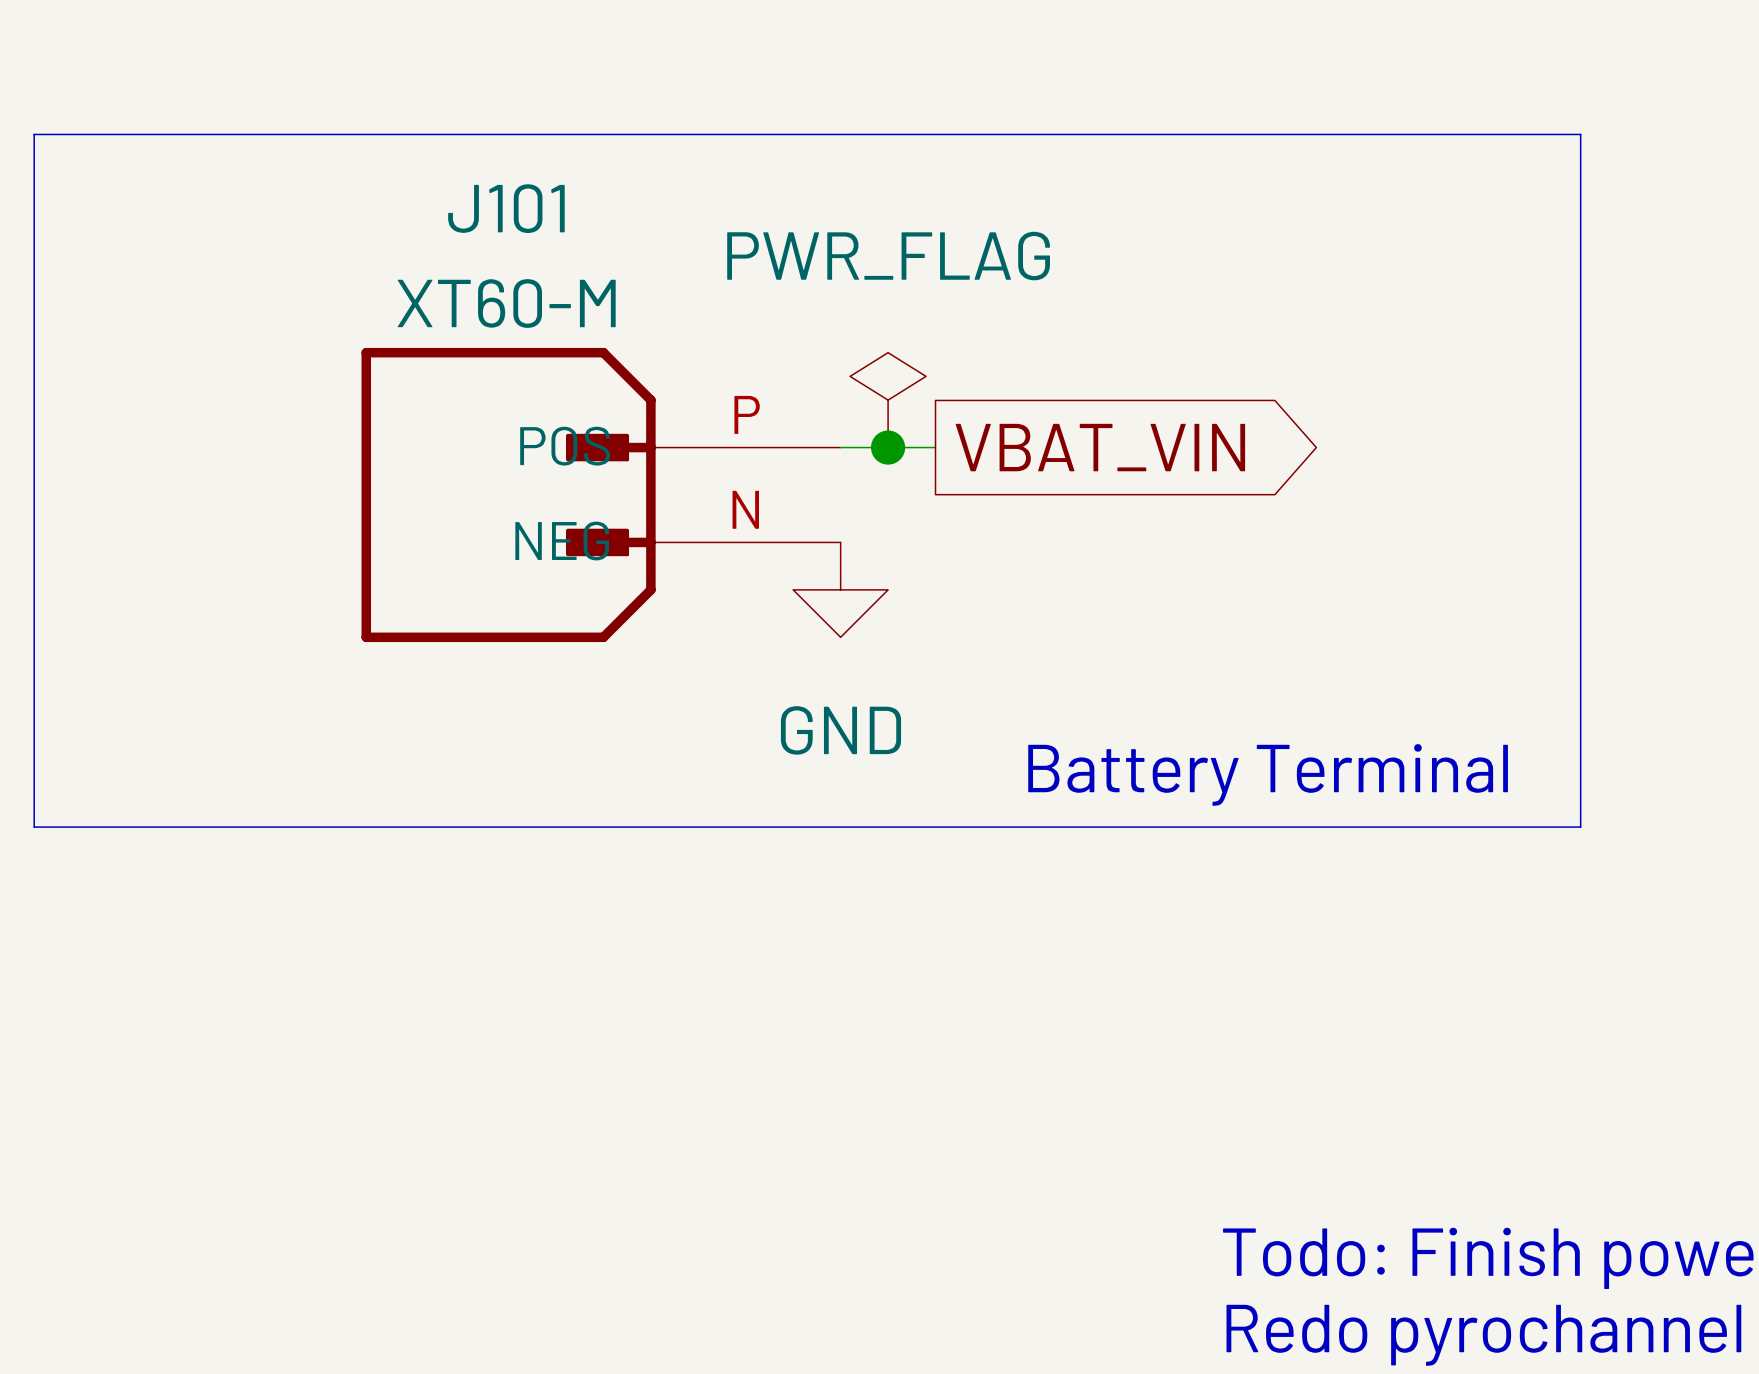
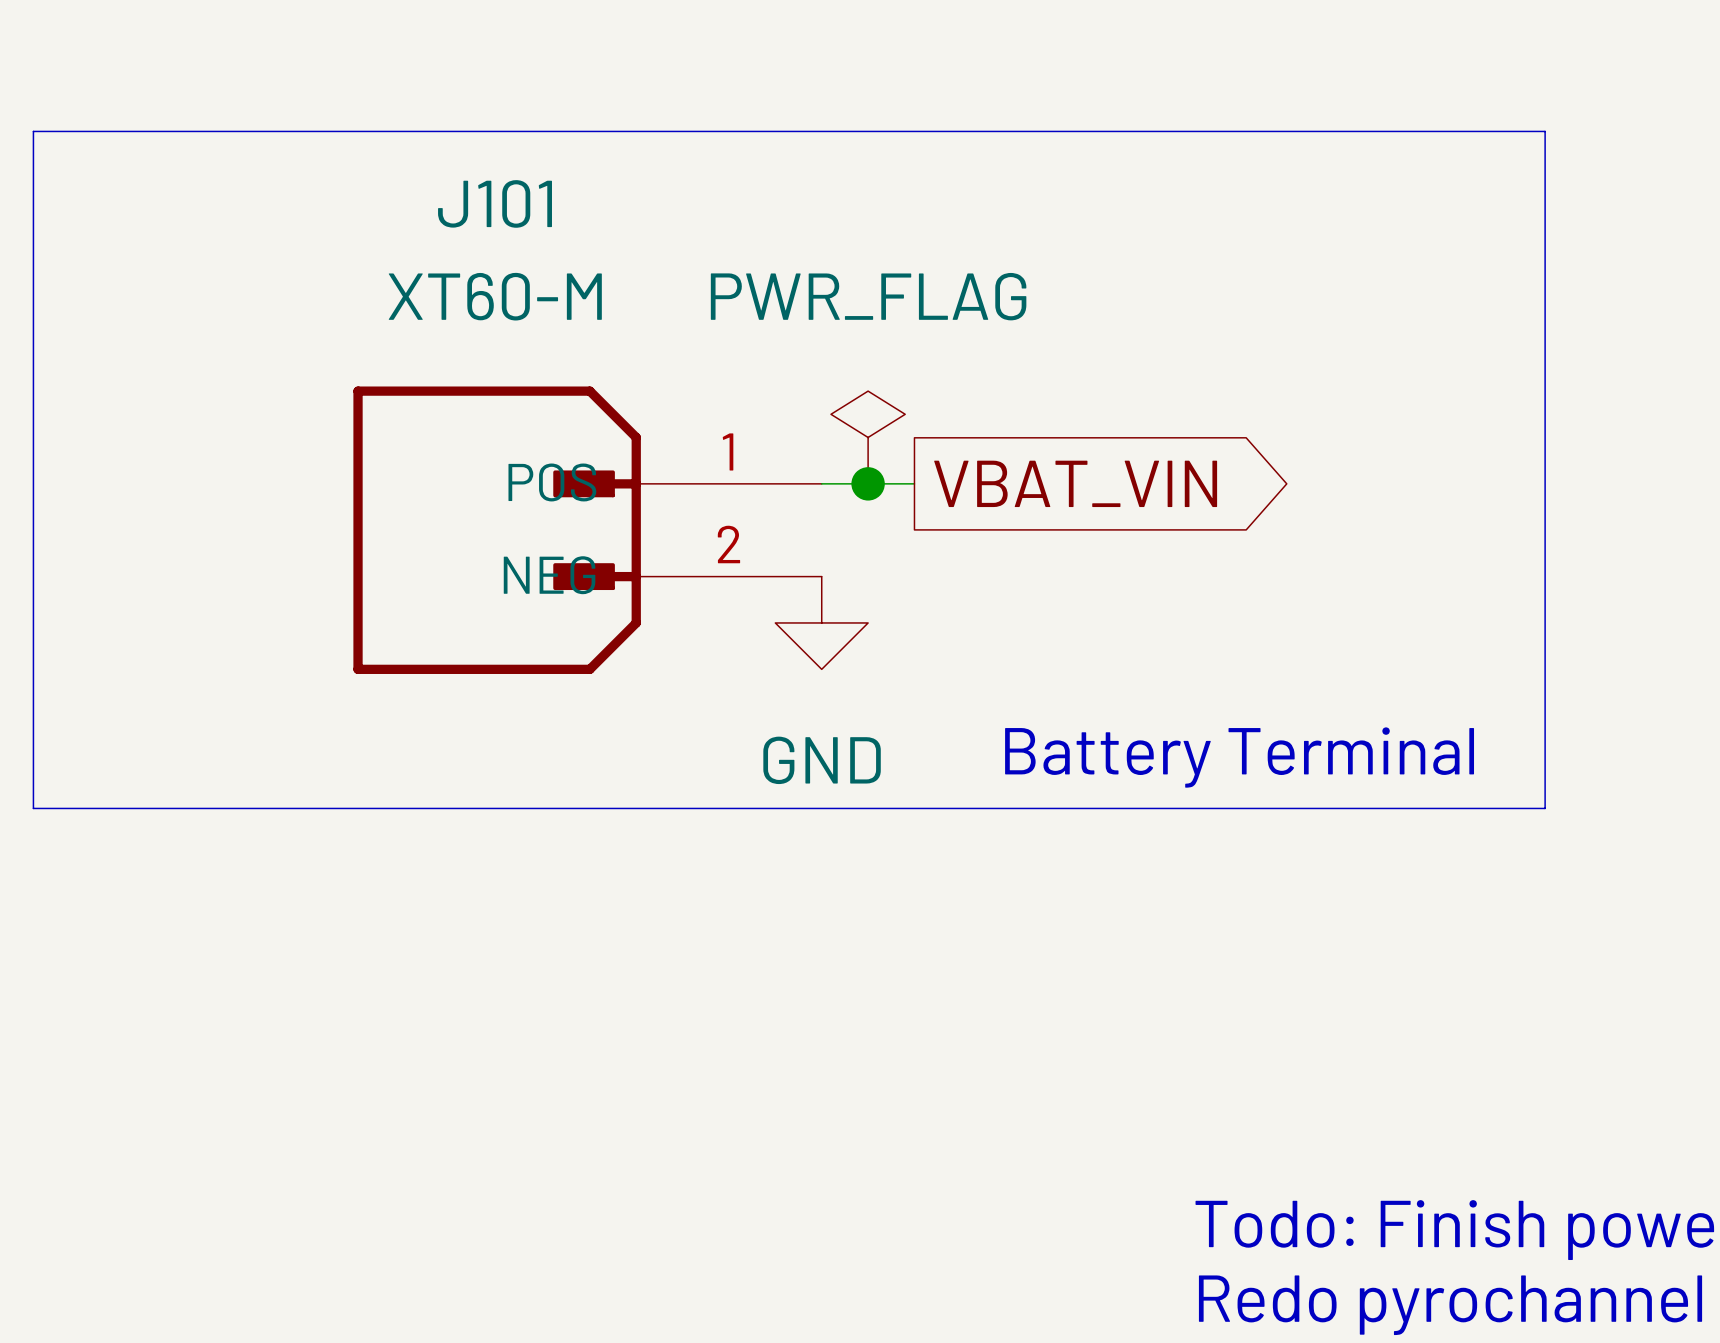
power symbol position: PWR_FLAG (888, 400) -> PWR_FLAG (868, 437)
J101 pin number: P (747, 414) -> 1 (728, 451)
wire: (840, 447) (935, 447) -> (821, 483) (914, 483)
junction position: (888, 447) -> (868, 483)
global label position: VBAT_VIN (1100, 447) -> VBAT_VIN (1075, 483)
J101 position: (601, 495) -> (587, 530)
J101 pin number: N (745, 509) -> 2 (728, 544)
power symbol position: GND (840, 589) -> GND (821, 622)

